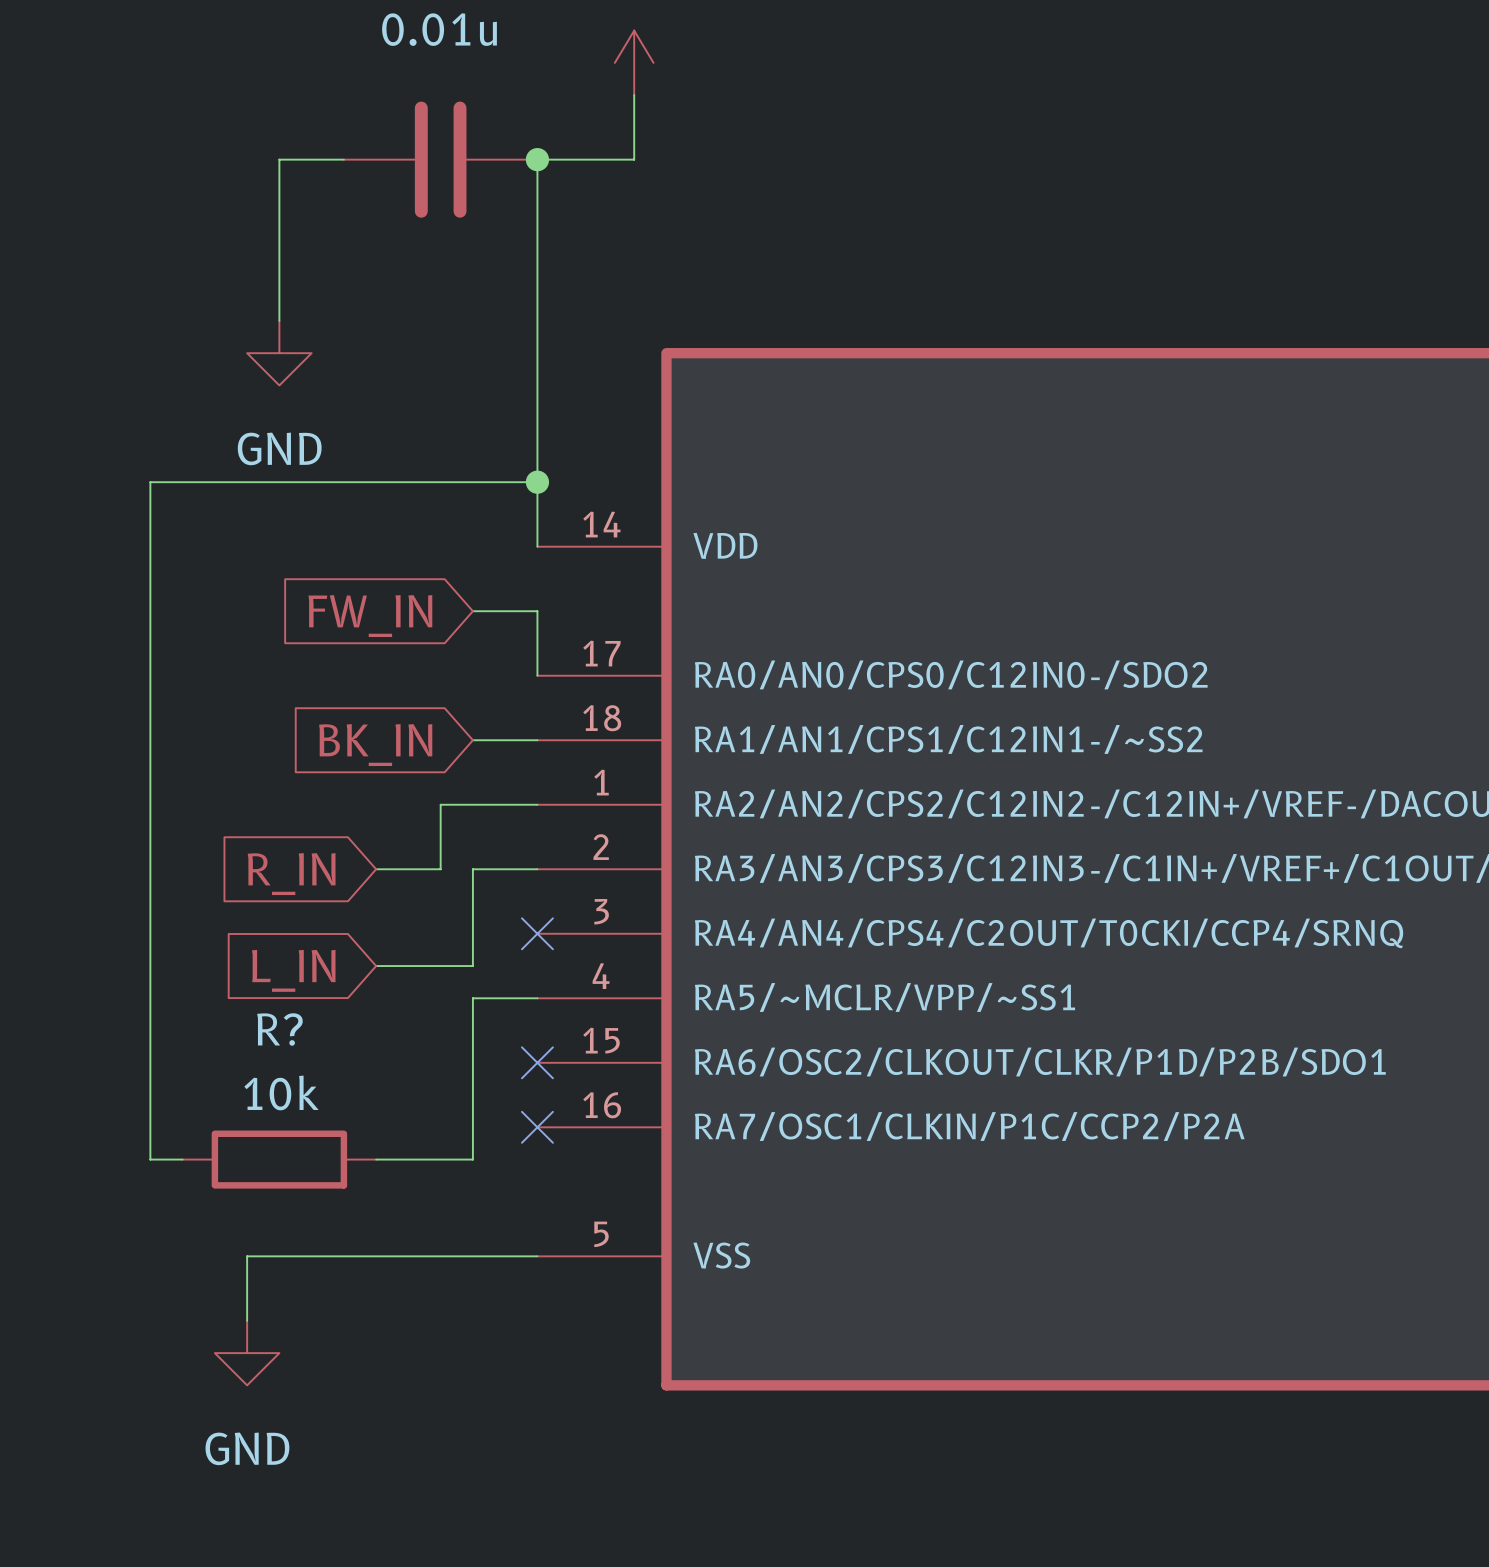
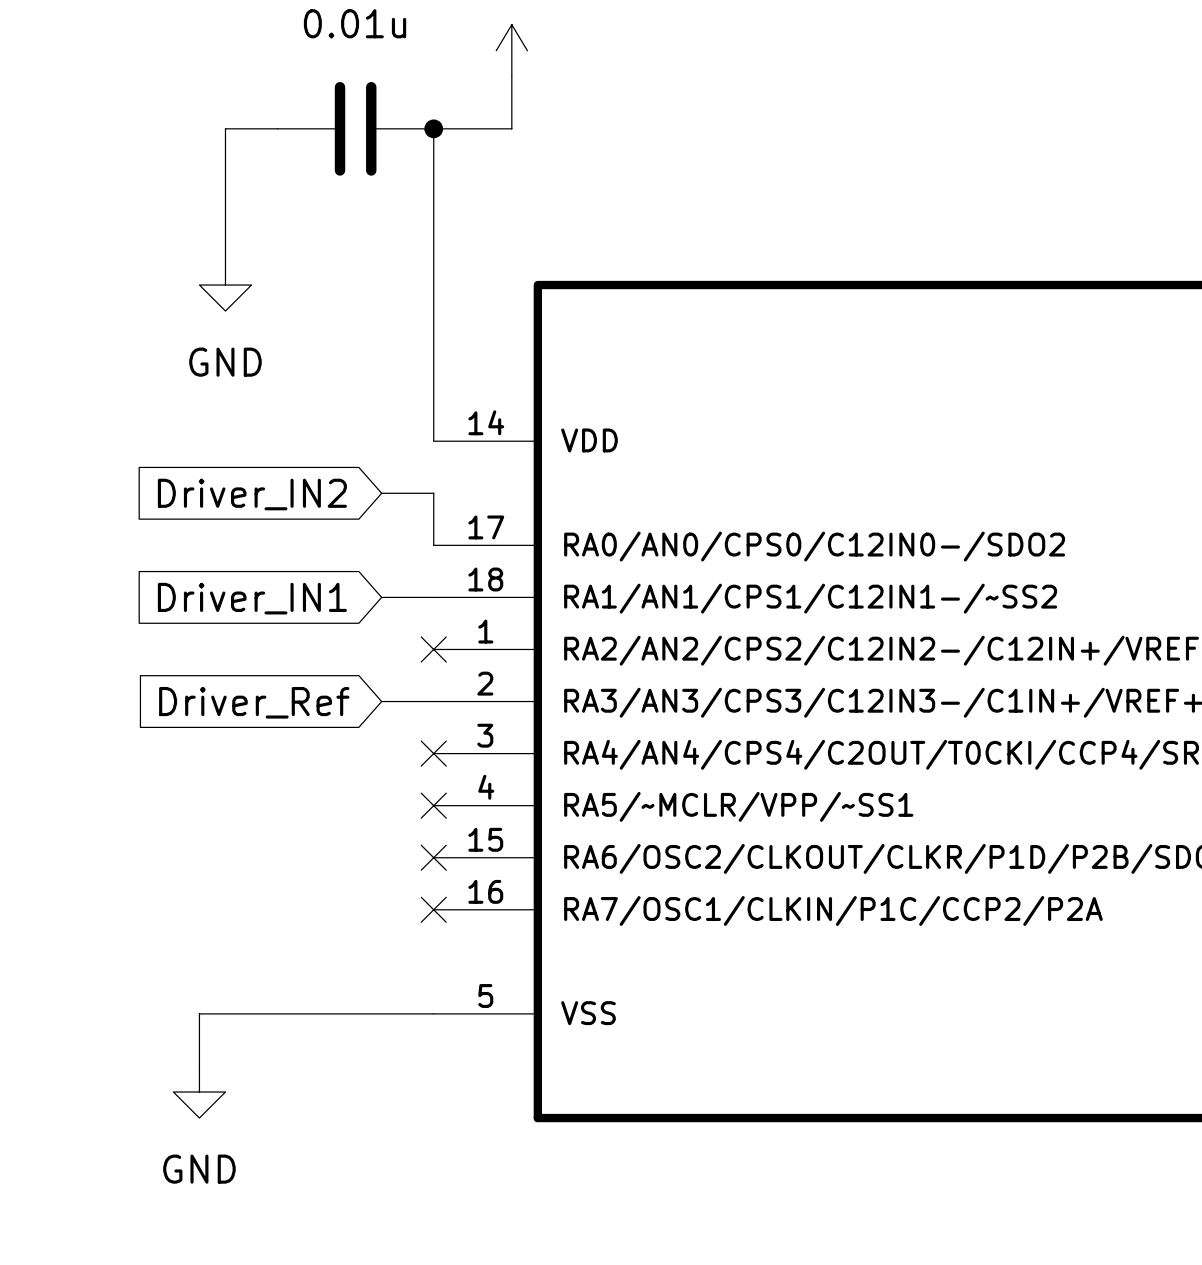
wire: (537, 482) (150, 482) (150, 1159) (182, 1159) -> none
junction: (537, 482) -> none
global label: FW_IN (370, 616) -> Driver_IN2 (252, 494)
global label: BK_IN (375, 745) -> Driver_IN1 (252, 598)
wire: (537, 804) (440, 804) (440, 869) (376, 869) -> none
no-connect mark: none -> (433, 649)
wire: (472, 869) (472, 966) (376, 966) -> none
global label: none -> Driver_Ref (254, 702)
global label: R_IN (291, 874) -> none
global label: L_IN (293, 970) -> none
wire: (537, 998) (472, 998) (472, 1159) (376, 1159) -> none
no-connect mark: none -> (433, 805)
R?: 10k (279, 1159) -> none

